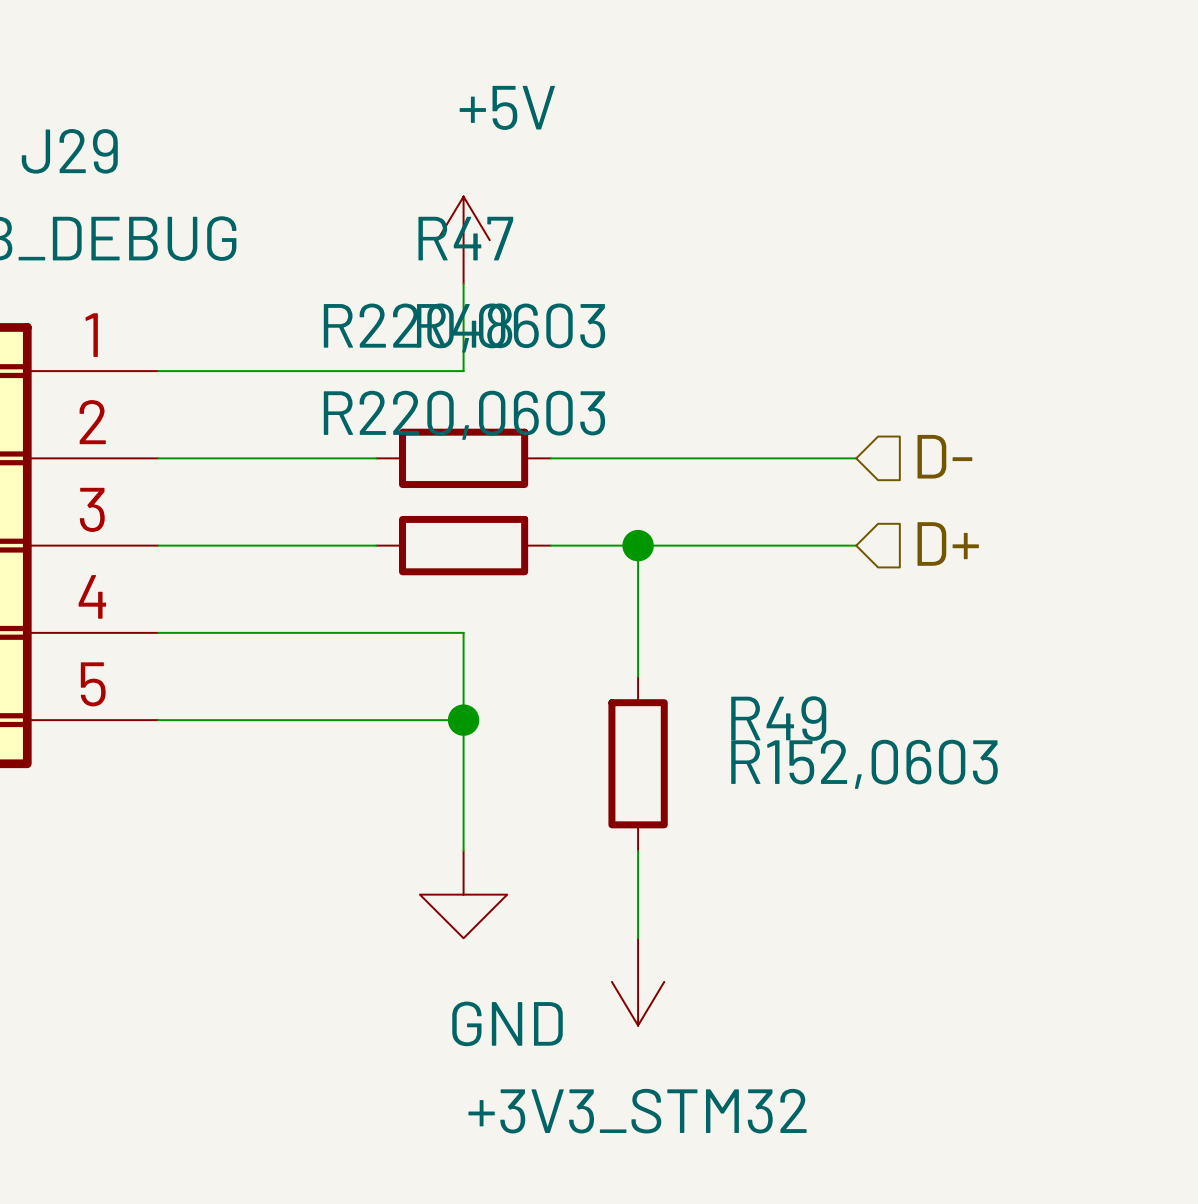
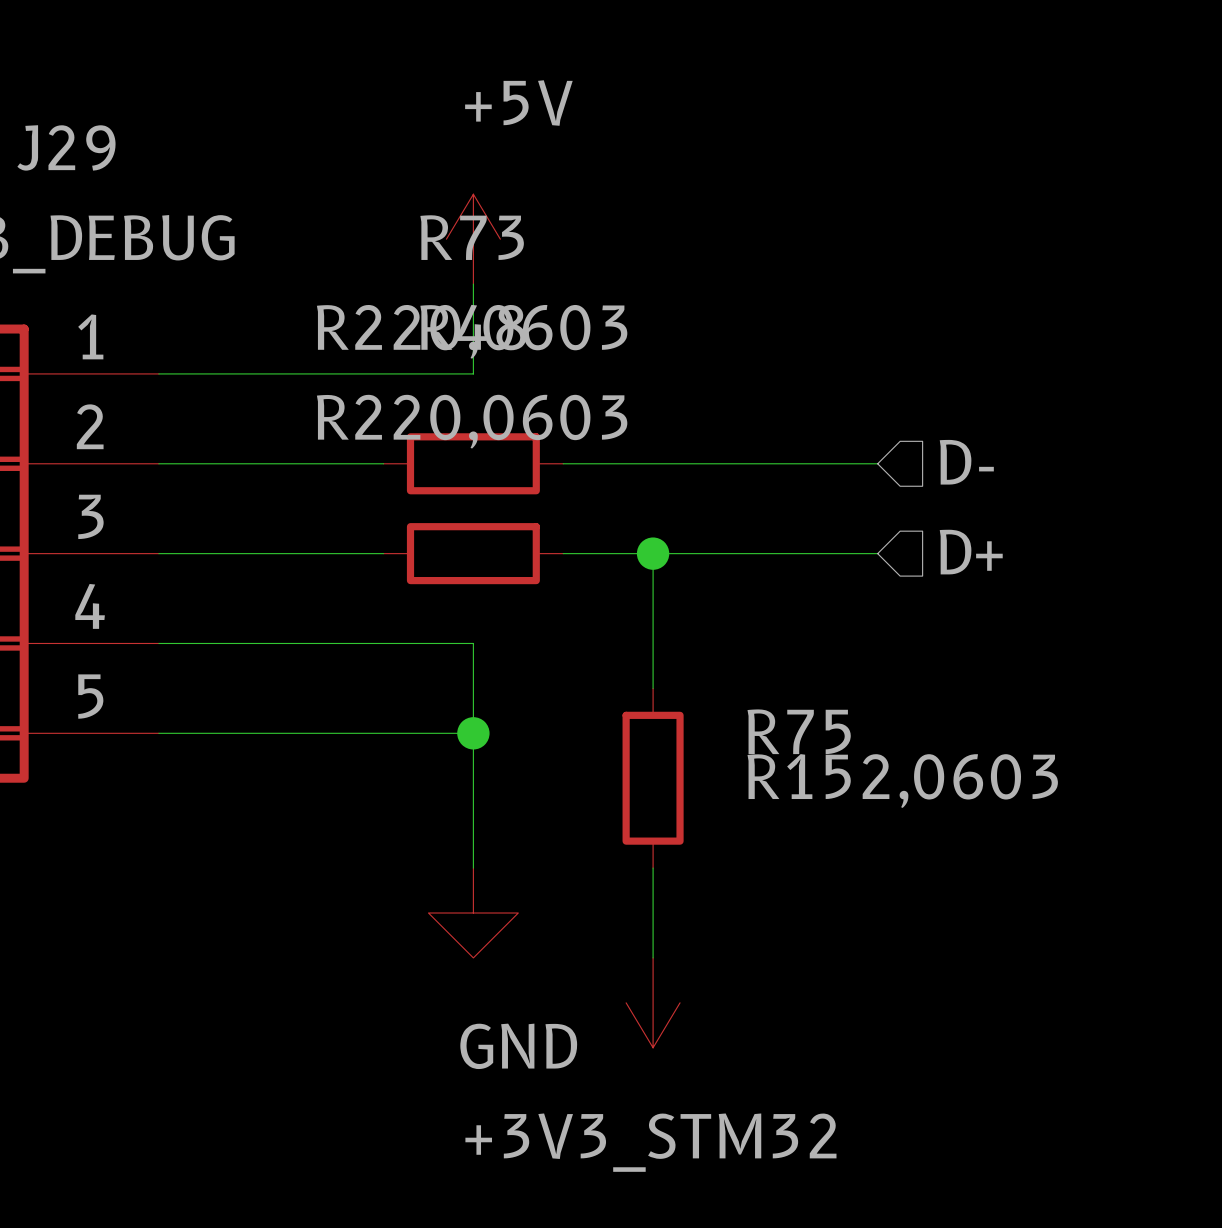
R47 name: R47 (465, 238) -> R73 (472, 237)
R49 name: R49 (778, 718) -> R75 (799, 731)

